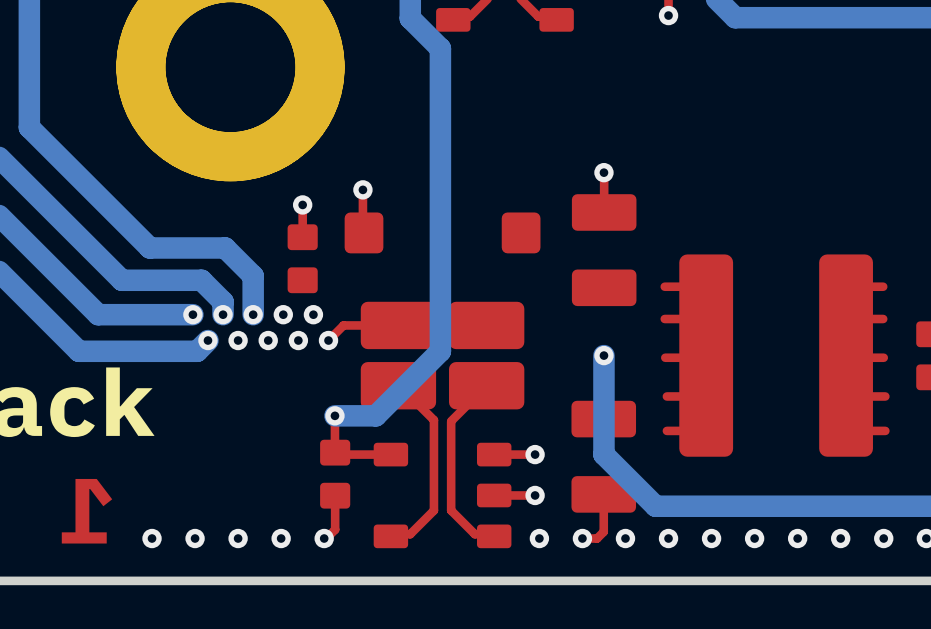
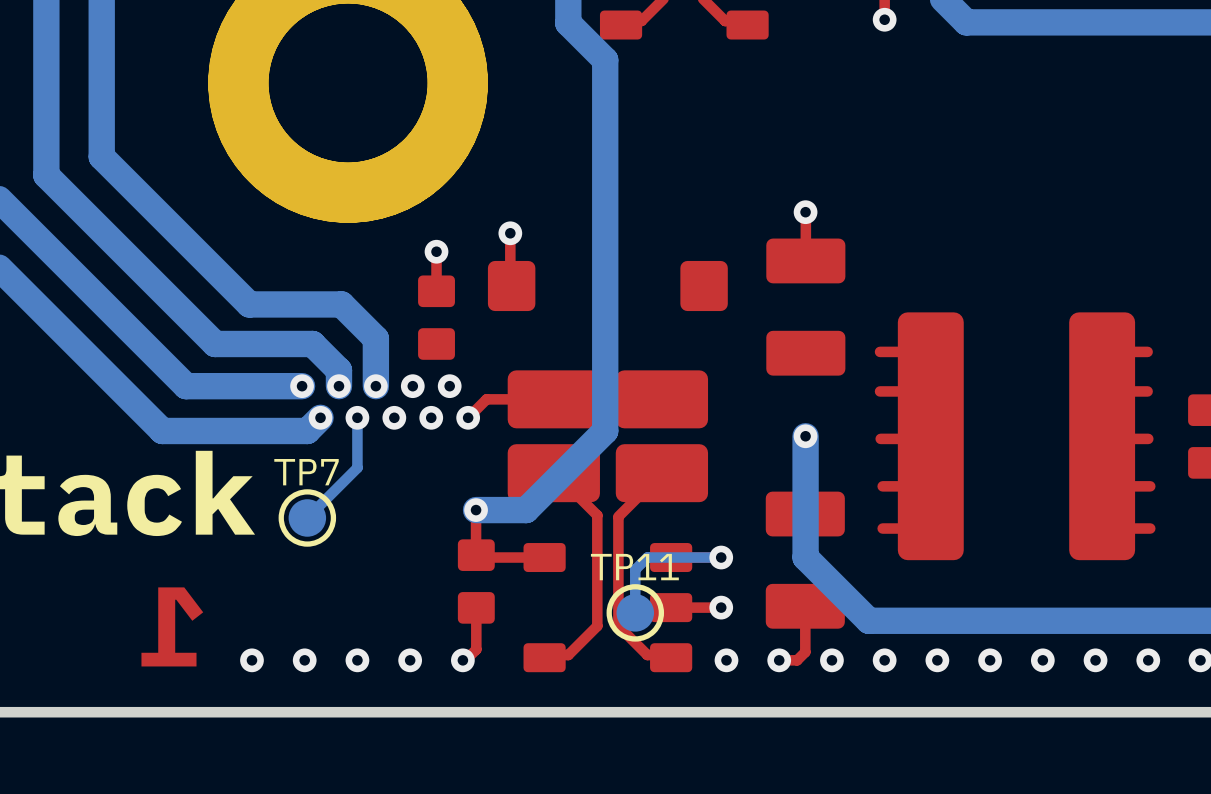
bottom track: none -> (357, 417) (357, 467) (307, 517)
TP7: none -> (307, 517)
bottom track: none -> (721, 557) (647, 557) (635, 569) (635, 612)
TP11: none -> (635, 612)

